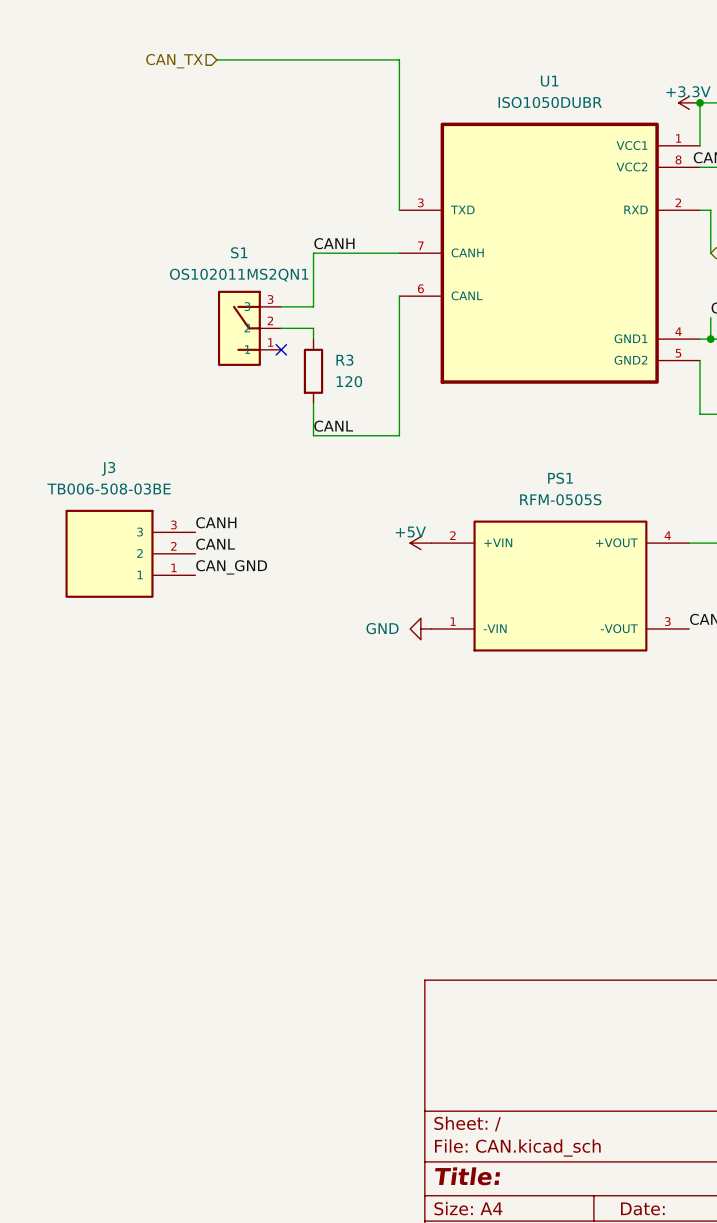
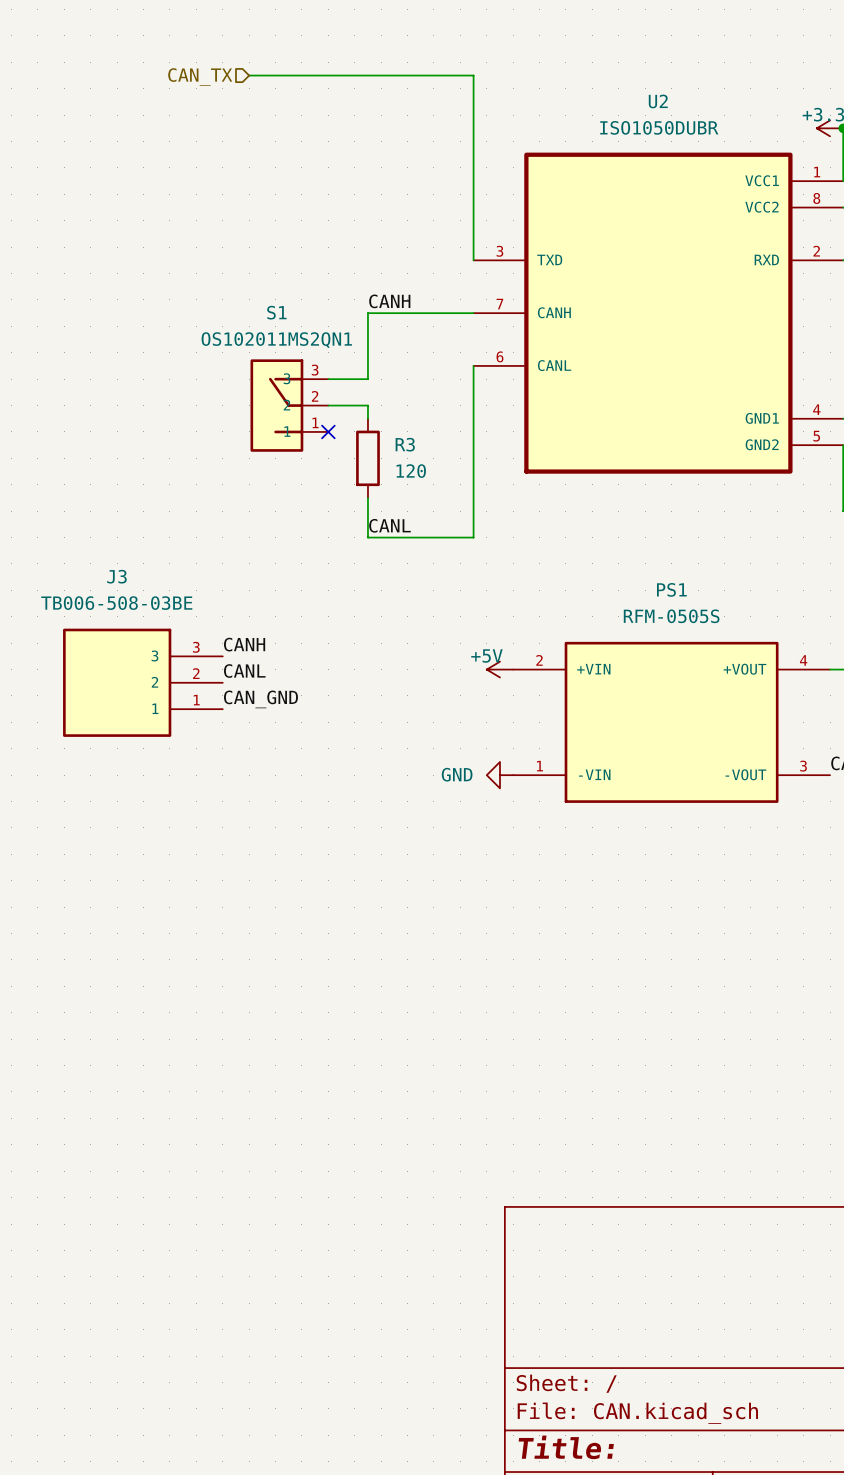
U1 name: U1 (549, 81) -> U2 (658, 101)

